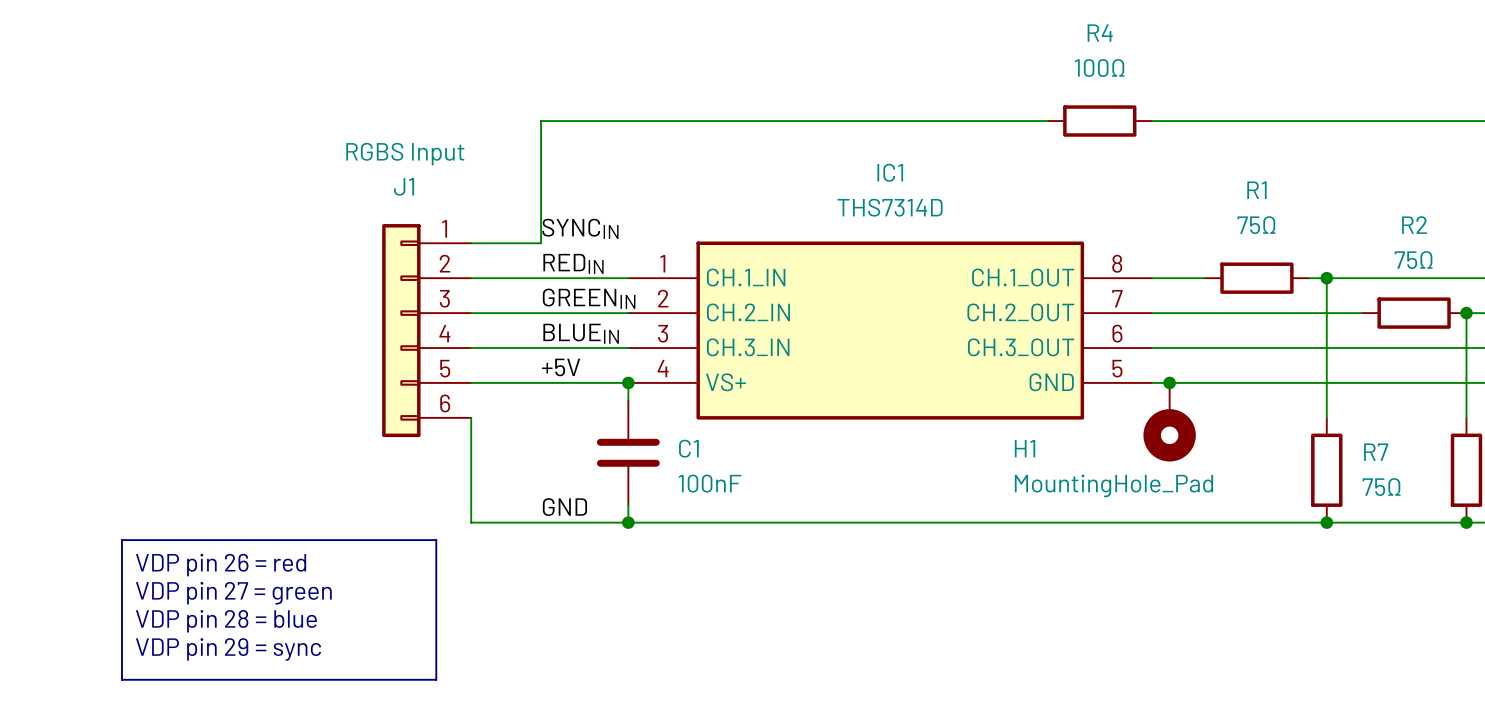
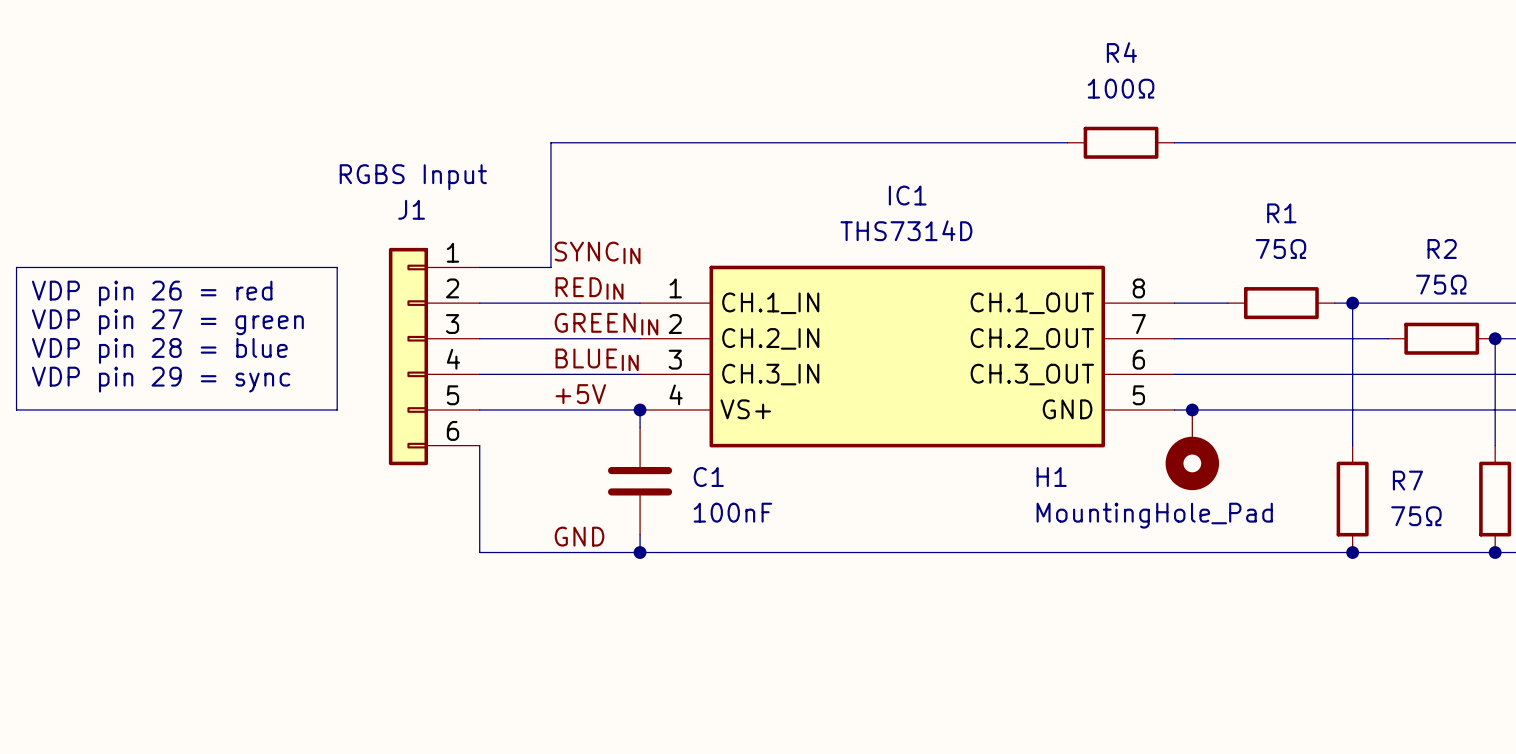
line: (121, 540) (436, 540) (436, 679) (121, 679) (121, 540) -> (16, 267) (337, 267) (337, 409) (16, 409) (16, 267)
text position: VDP pin 26 = red (221, 565) -> VDP pin 26 = red (152, 293)
text position: VDP pin 27 = green (233, 593) -> VDP pin 27 = green (167, 322)
text position: VDP pin 28 = blue (226, 621) -> VDP pin 28 = blue (159, 350)
text position: VDP pin 29 = sync (228, 649) -> VDP pin 29 = sync (161, 379)

